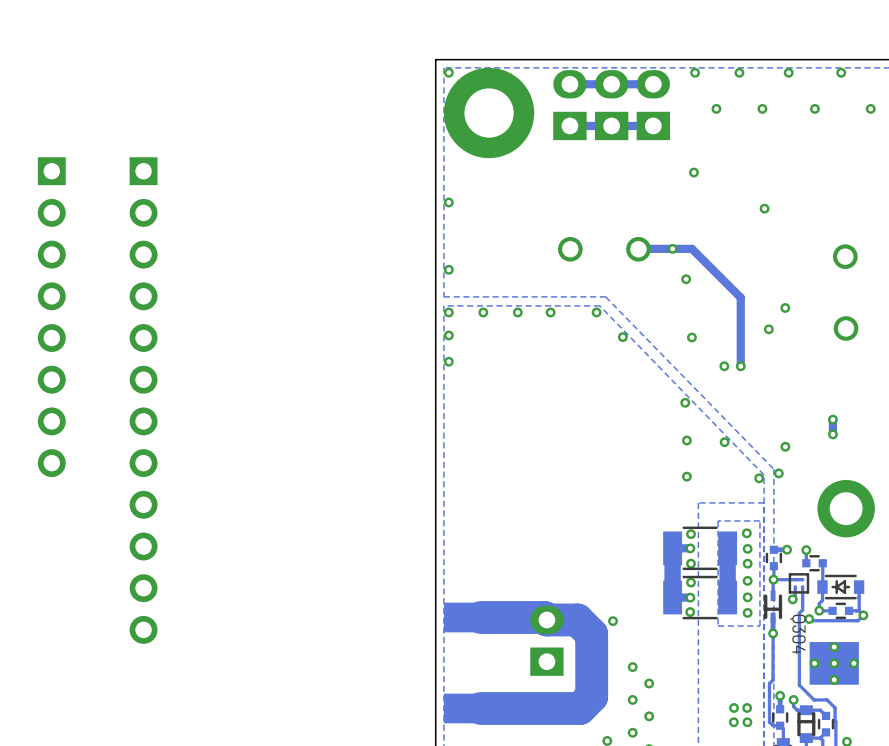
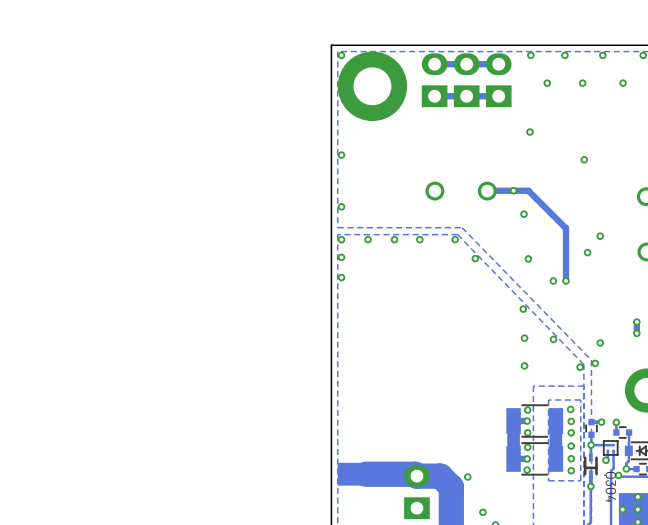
part: (51, 317) -> none
part: (143, 400) -> none

